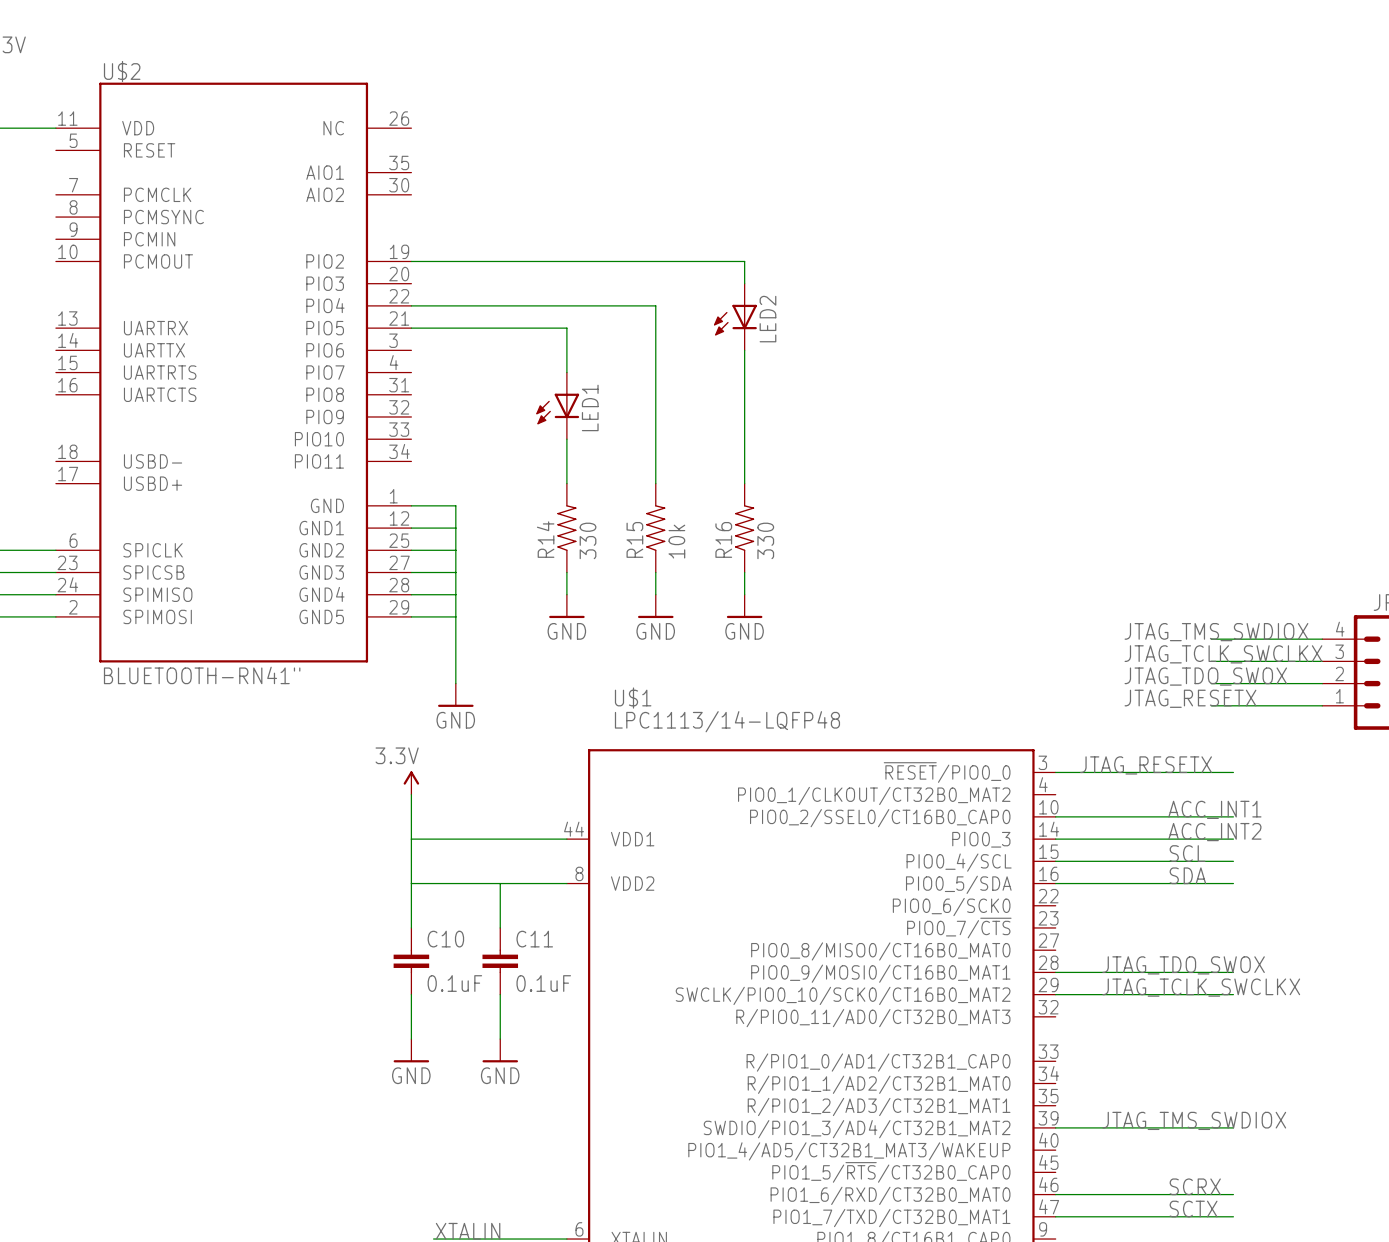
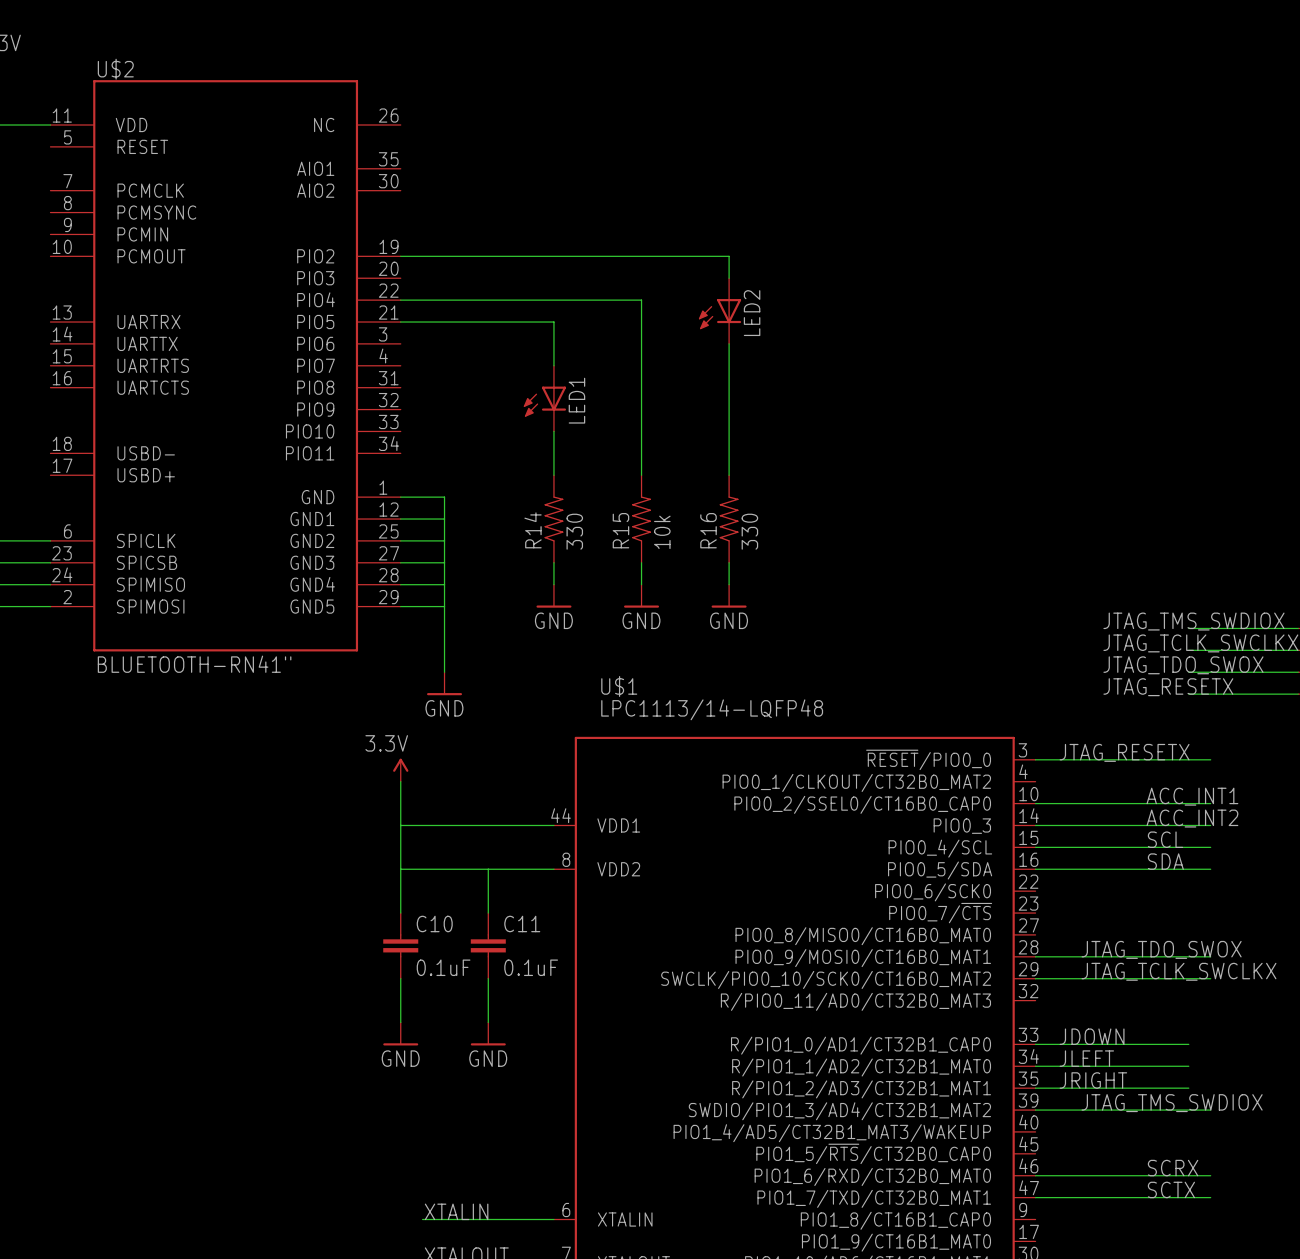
label: none -> JDOWN (1092, 1036)
wire: none -> (1035, 1044) (1188, 1044)
label: none -> JLEFT (1086, 1058)
wire: none -> (1035, 1066) (1188, 1066)
label: none -> JRIGHT (1093, 1080)
wire: none -> (1035, 1088) (1188, 1088)

